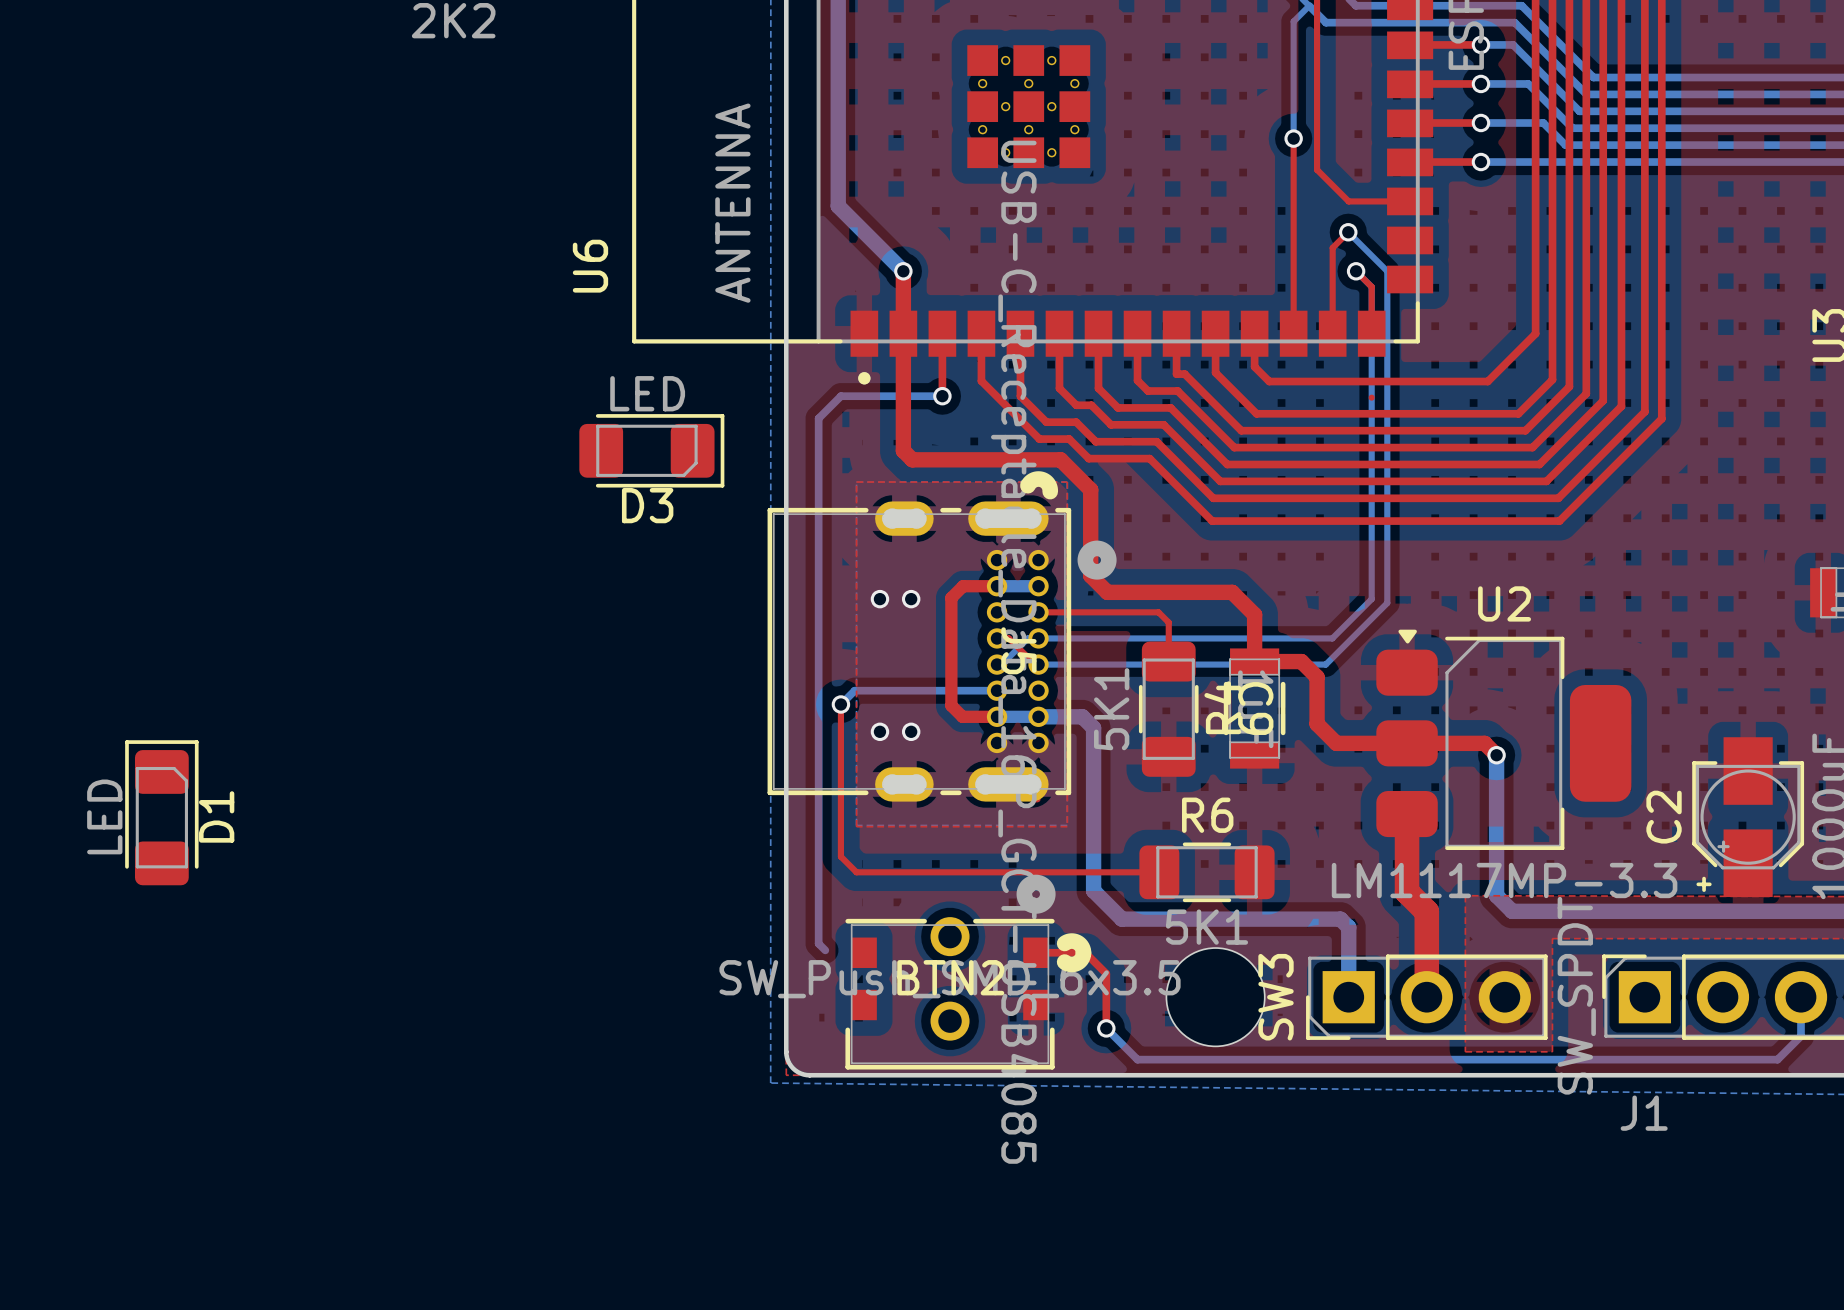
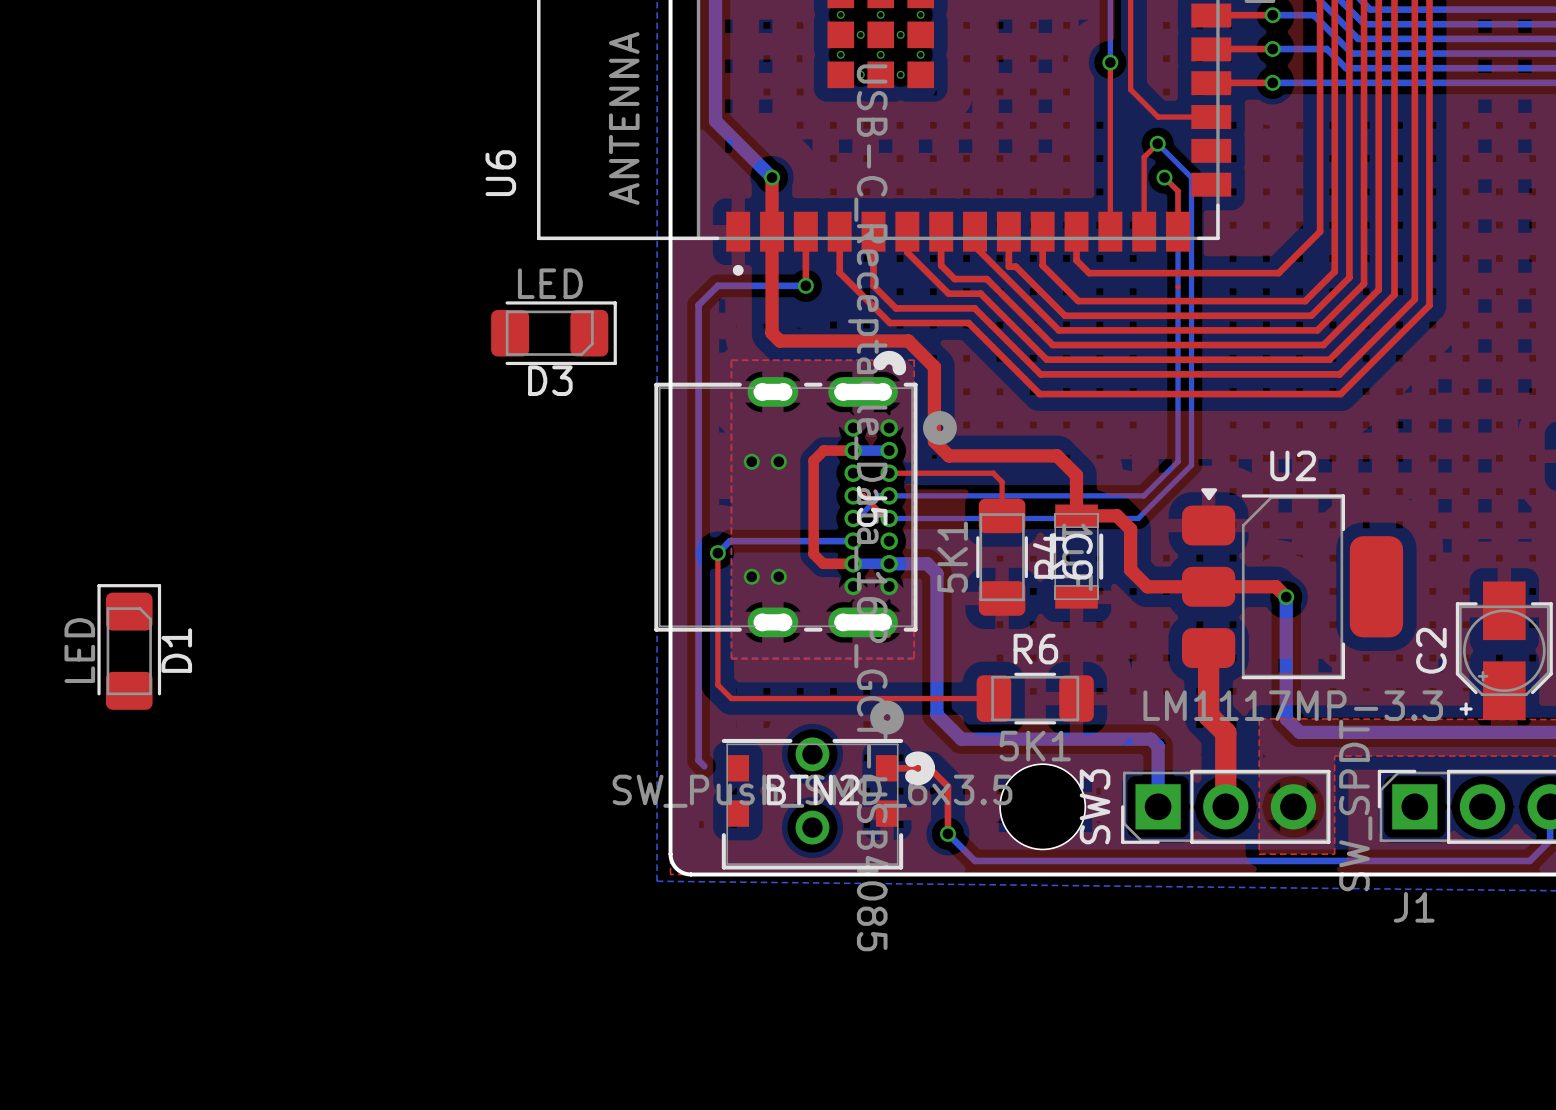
top track: (1137, 350) (1137, 380) (1147, 391) (1177, 391) -> (975, 246) (1009, 281)
top track: (1059, 357) (1059, 388) (1076, 405) (1091, 405) (1111, 424) (1163, 424) -> (907, 252) (948, 293) (980, 293) (997, 310)
top track: (1098, 372) (1098, 388) (1118, 407) (1170, 407) -> (941, 265) (954, 279) (986, 279) (1003, 296)
top track: (1076, 422) (1095, 441) (1156, 441) -> (921, 308) (974, 308) (991, 325)
top track: (1069, 439) (1088, 458) (1149, 458) -> (915, 323) (968, 323) (985, 339)

